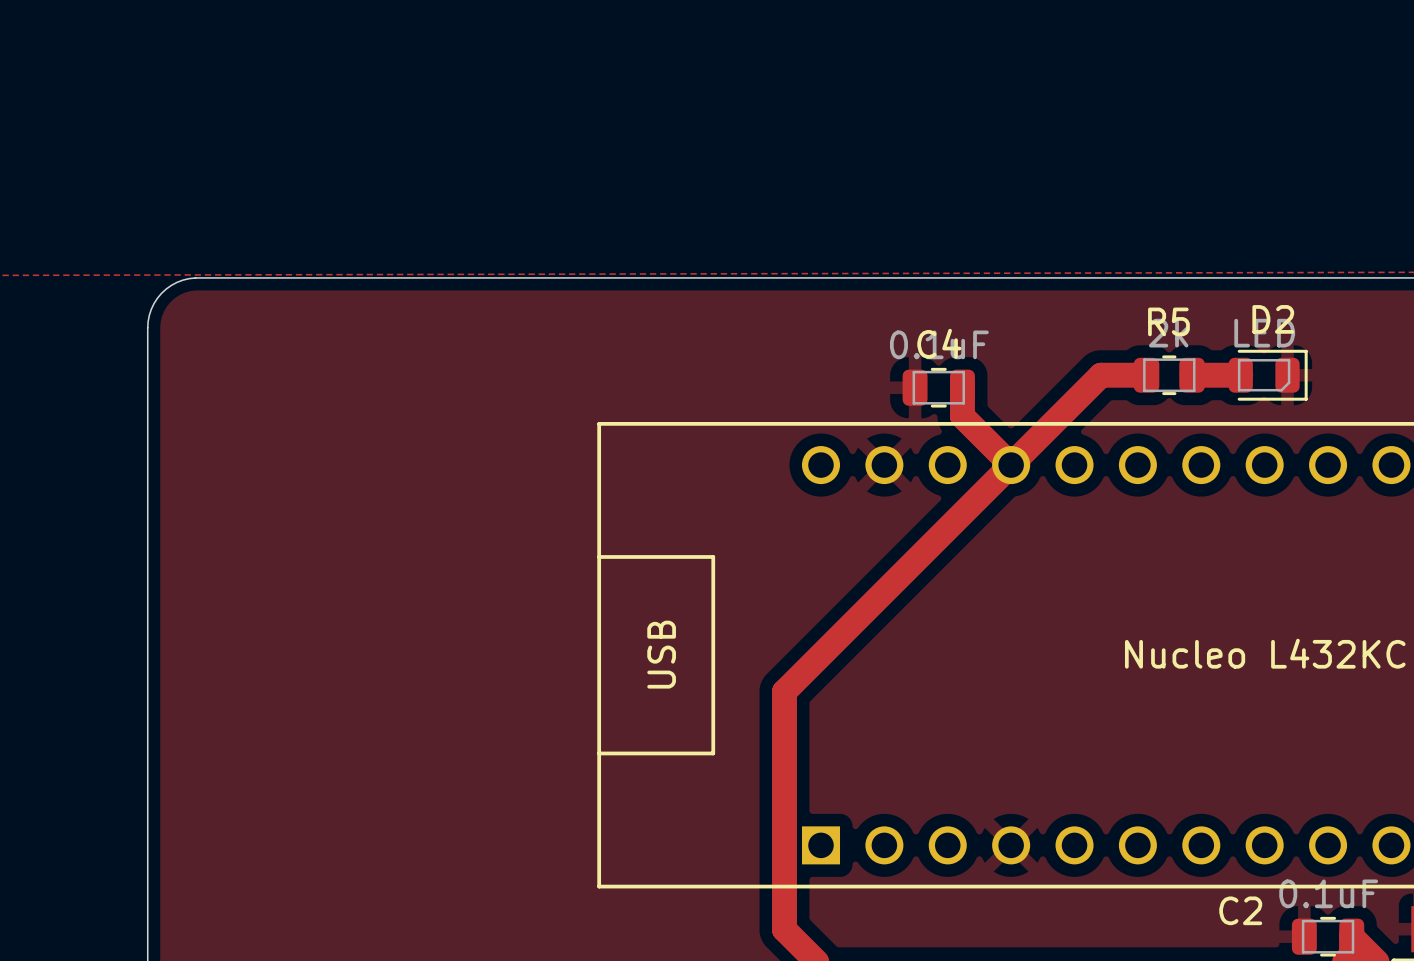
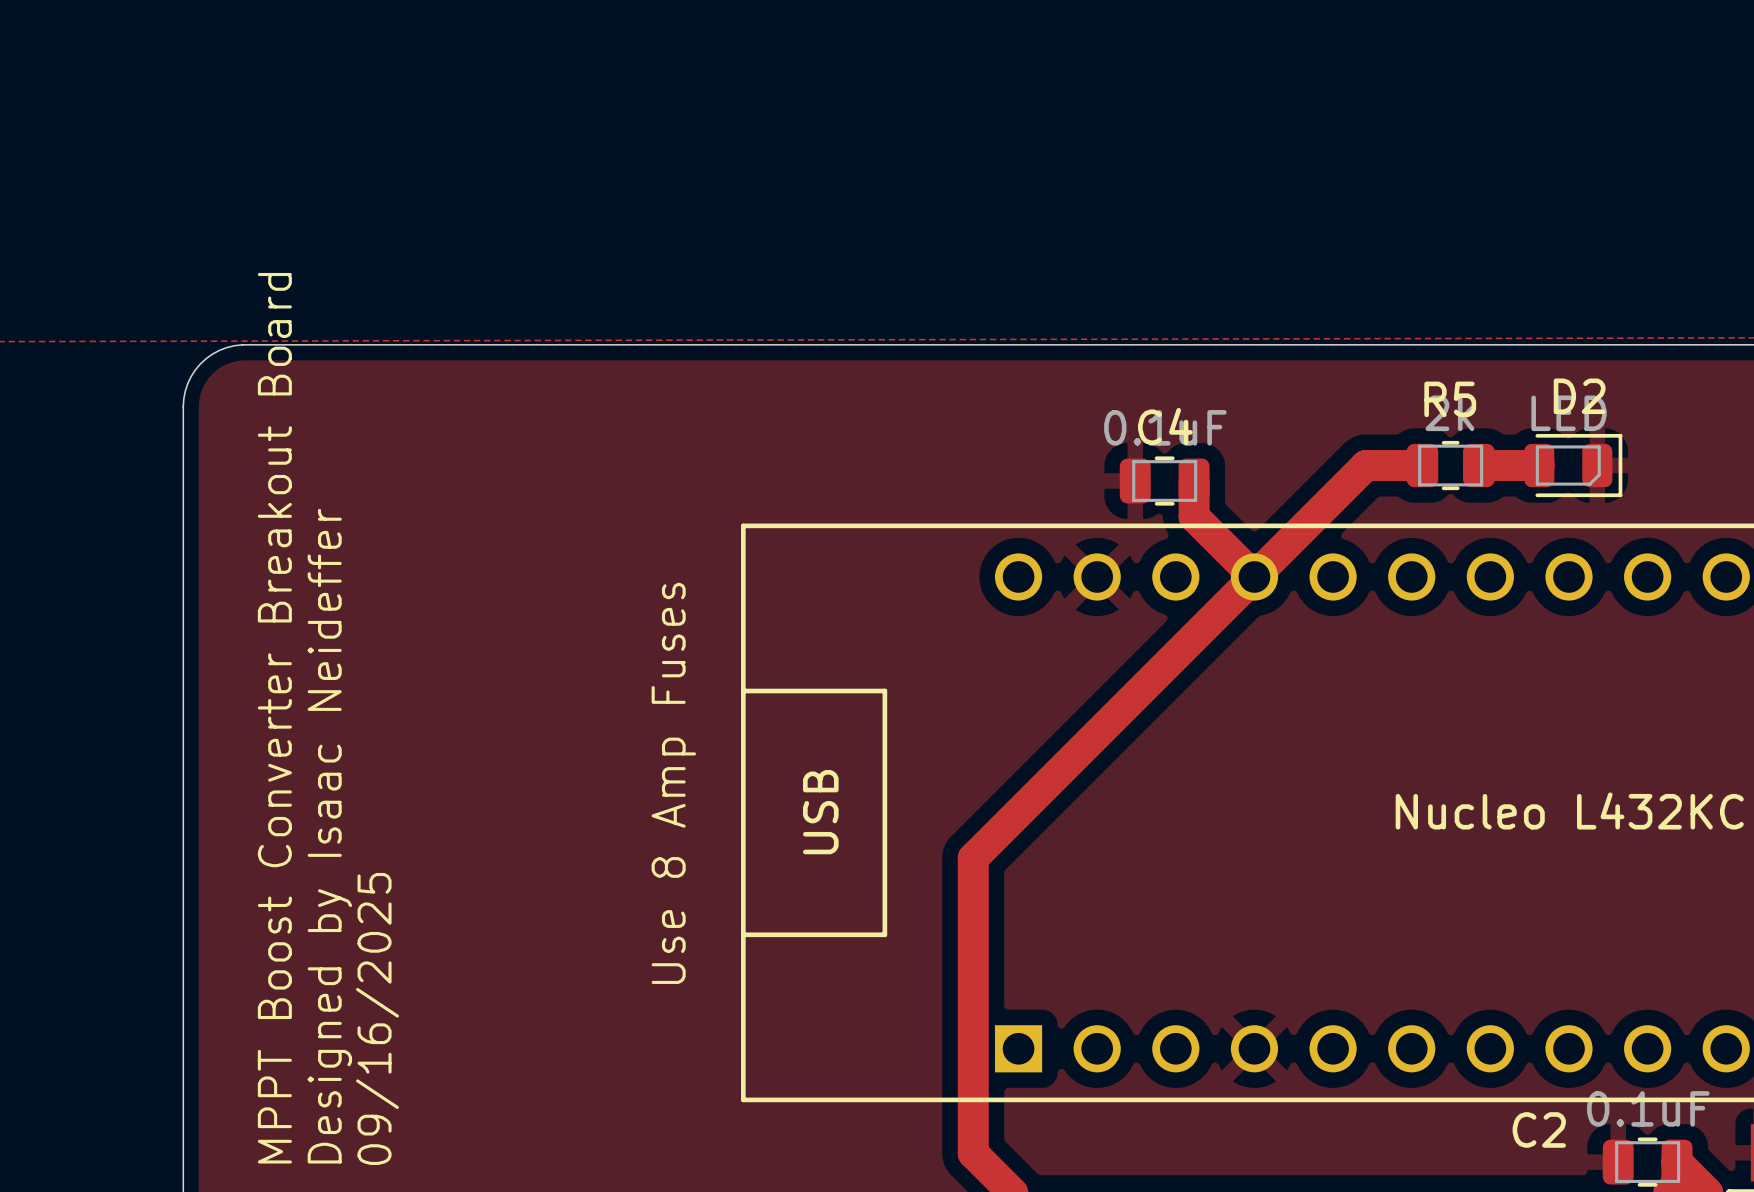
text: none -> MPPT Boost Converter Breakout Board (274, 718)
text: none -> Use 8 Amp Fuses (673, 783)
text: none -> Designed by Isaac Neideffer (329, 836)
text: none -> 09/16/2025 (377, 1018)

